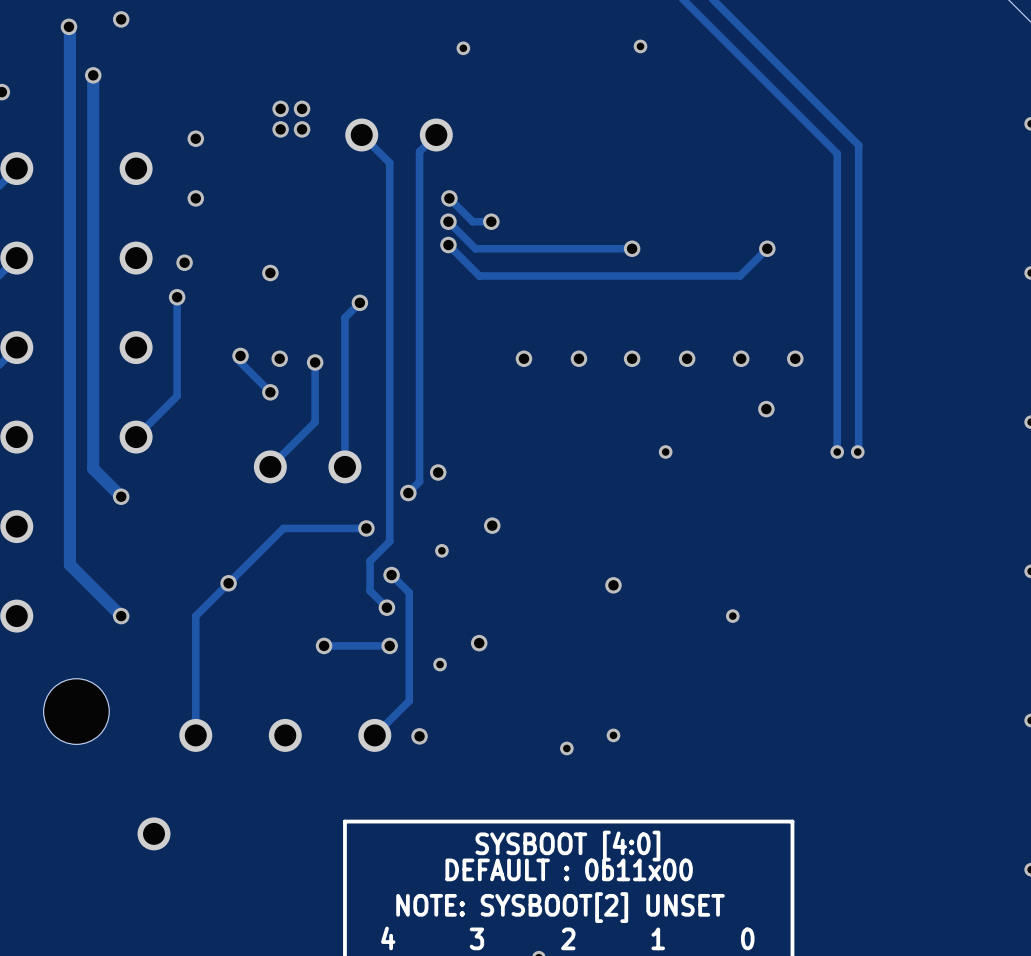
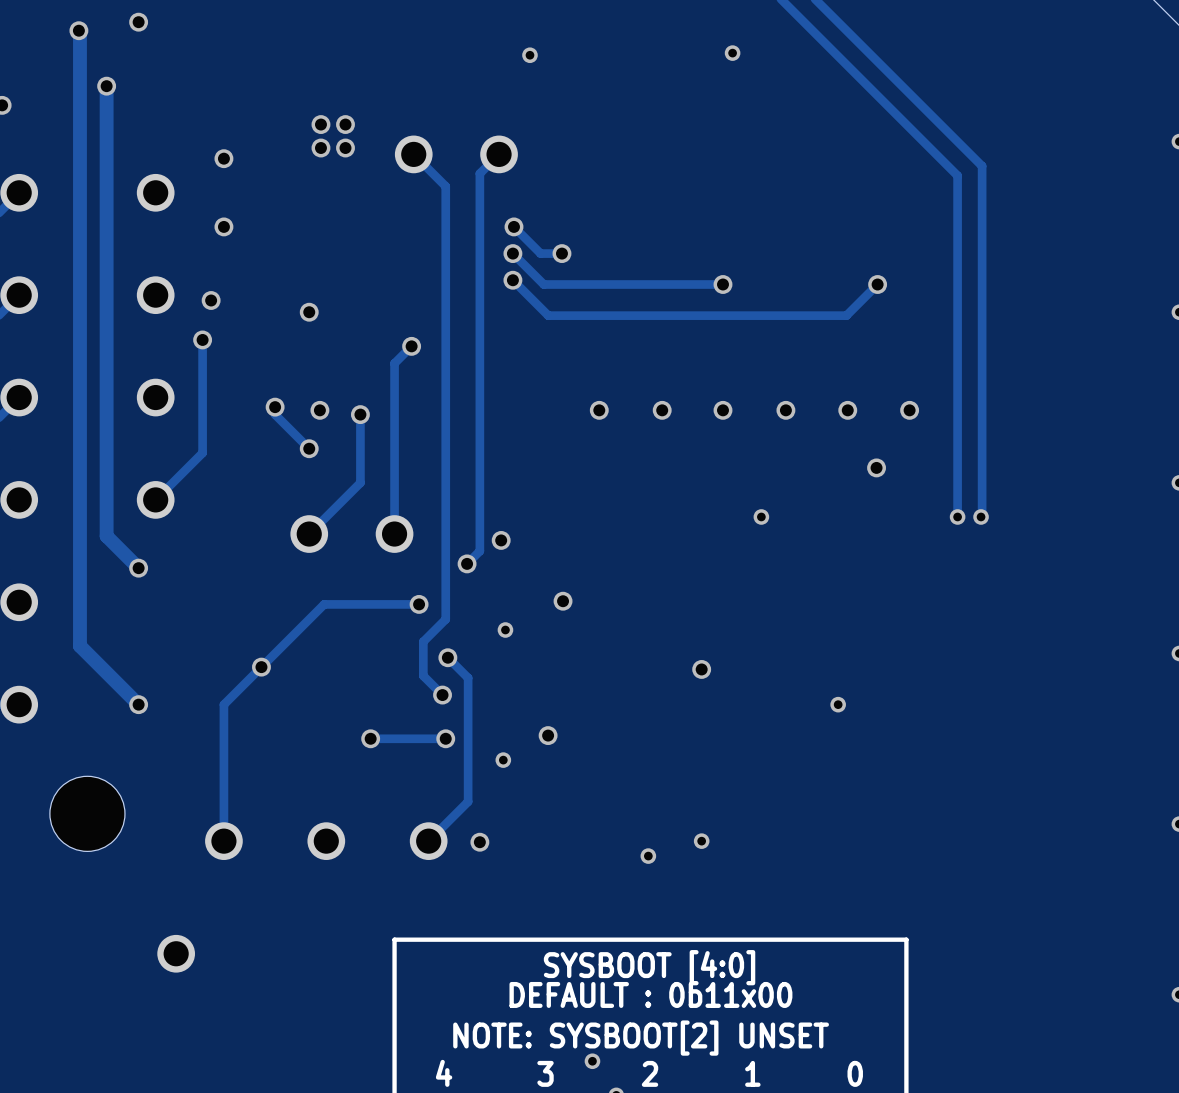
via: none -> (592, 1061)

